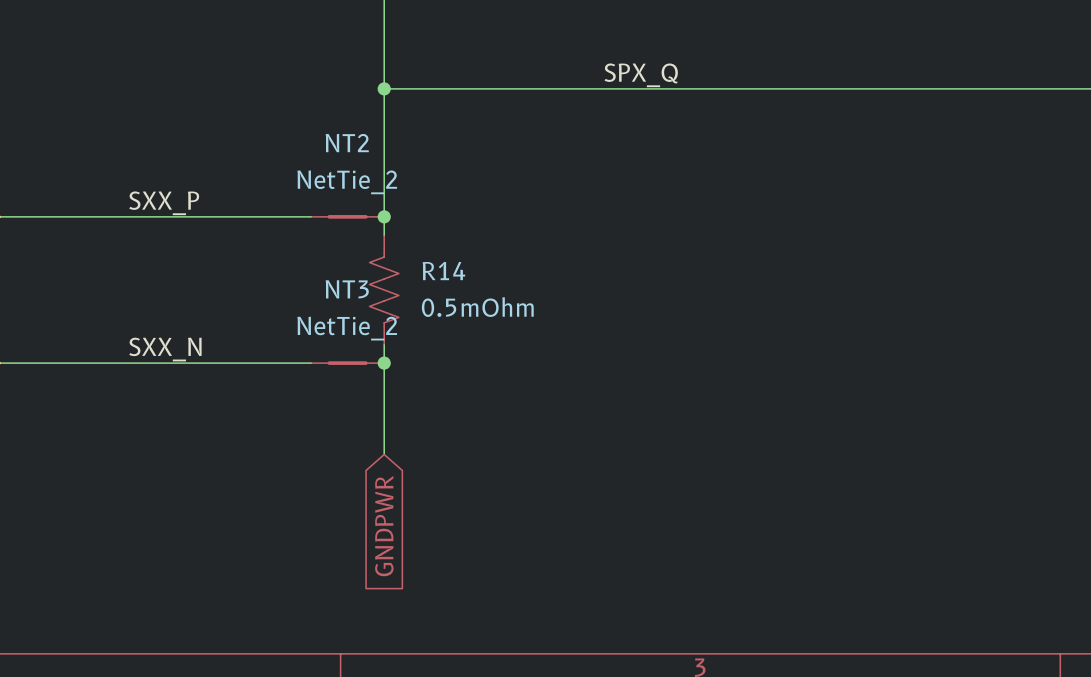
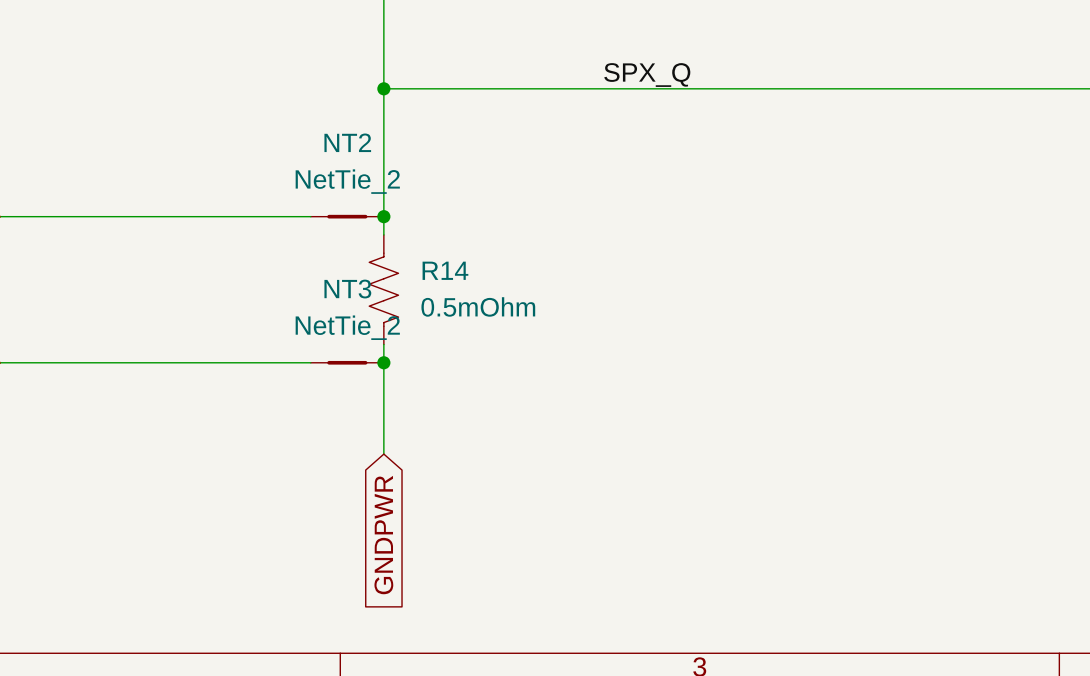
label: SXX_P (164, 203) -> none
label: SXX_N (165, 349) -> none

